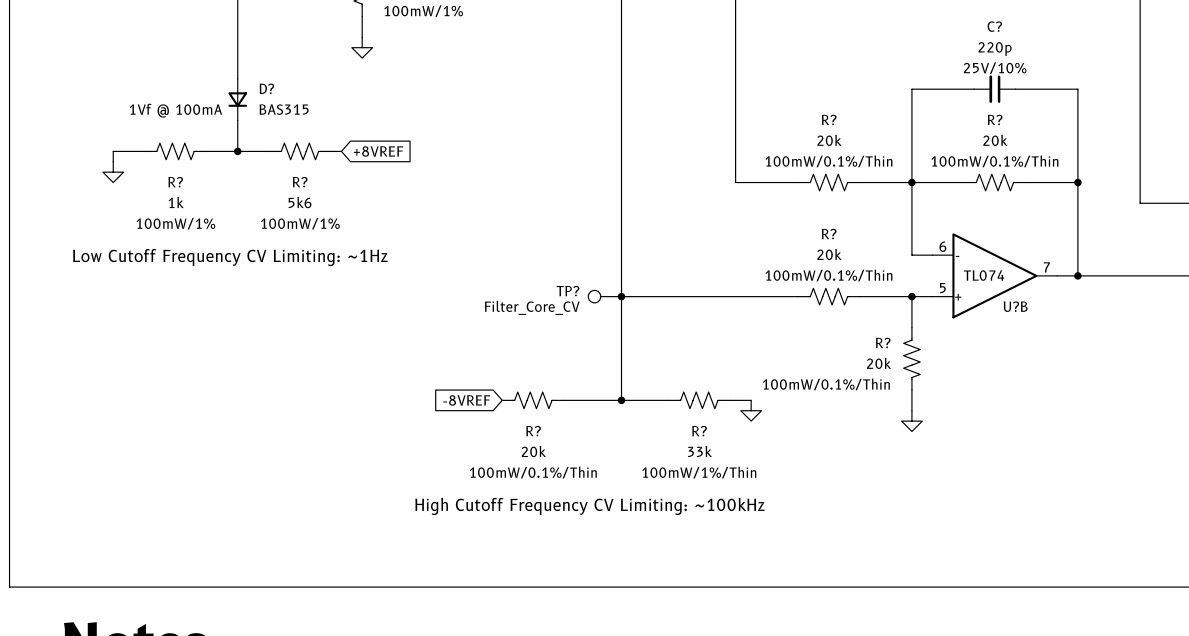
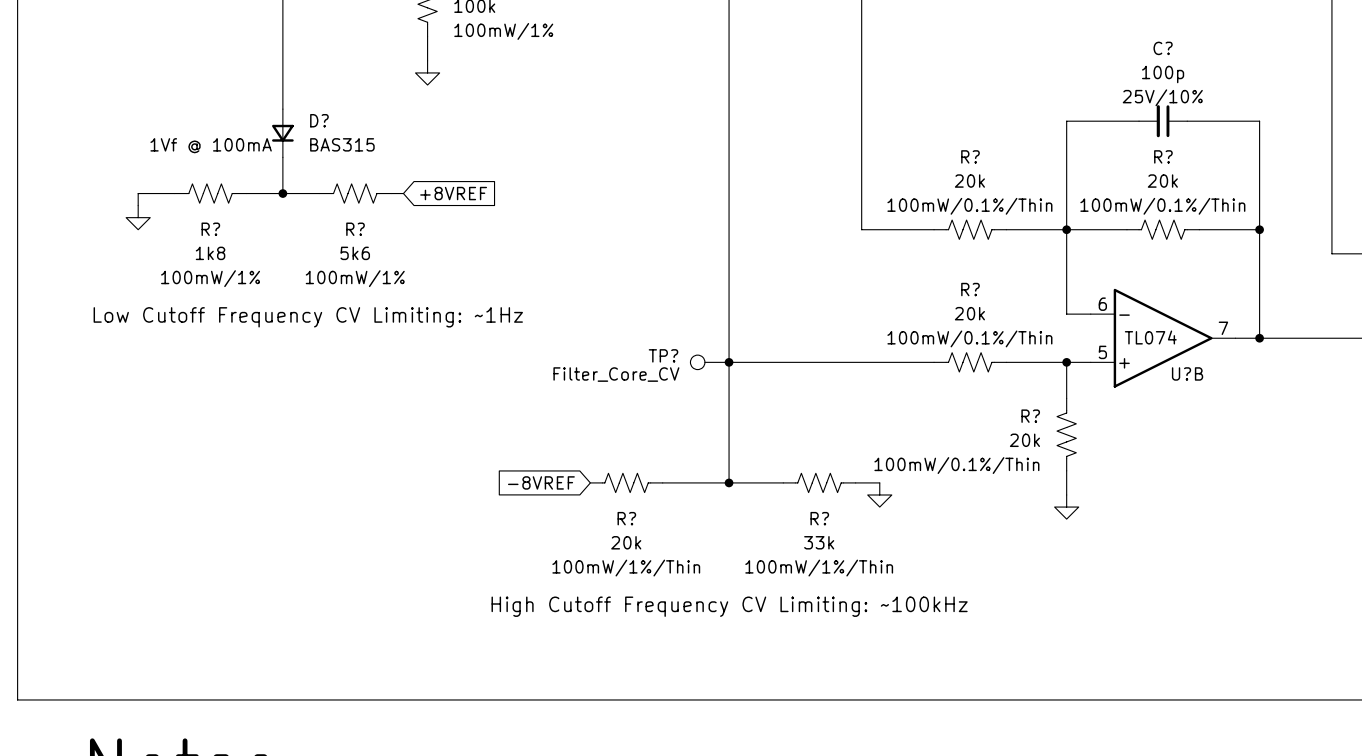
C? value: 220p (995, 49) -> 100p (1163, 74)
R? value: 1k (176, 202) -> 1k8 (210, 253)
R? text: 100mW/0.1%/Thin (533, 472) -> 100mW/1%/Thin (626, 568)

